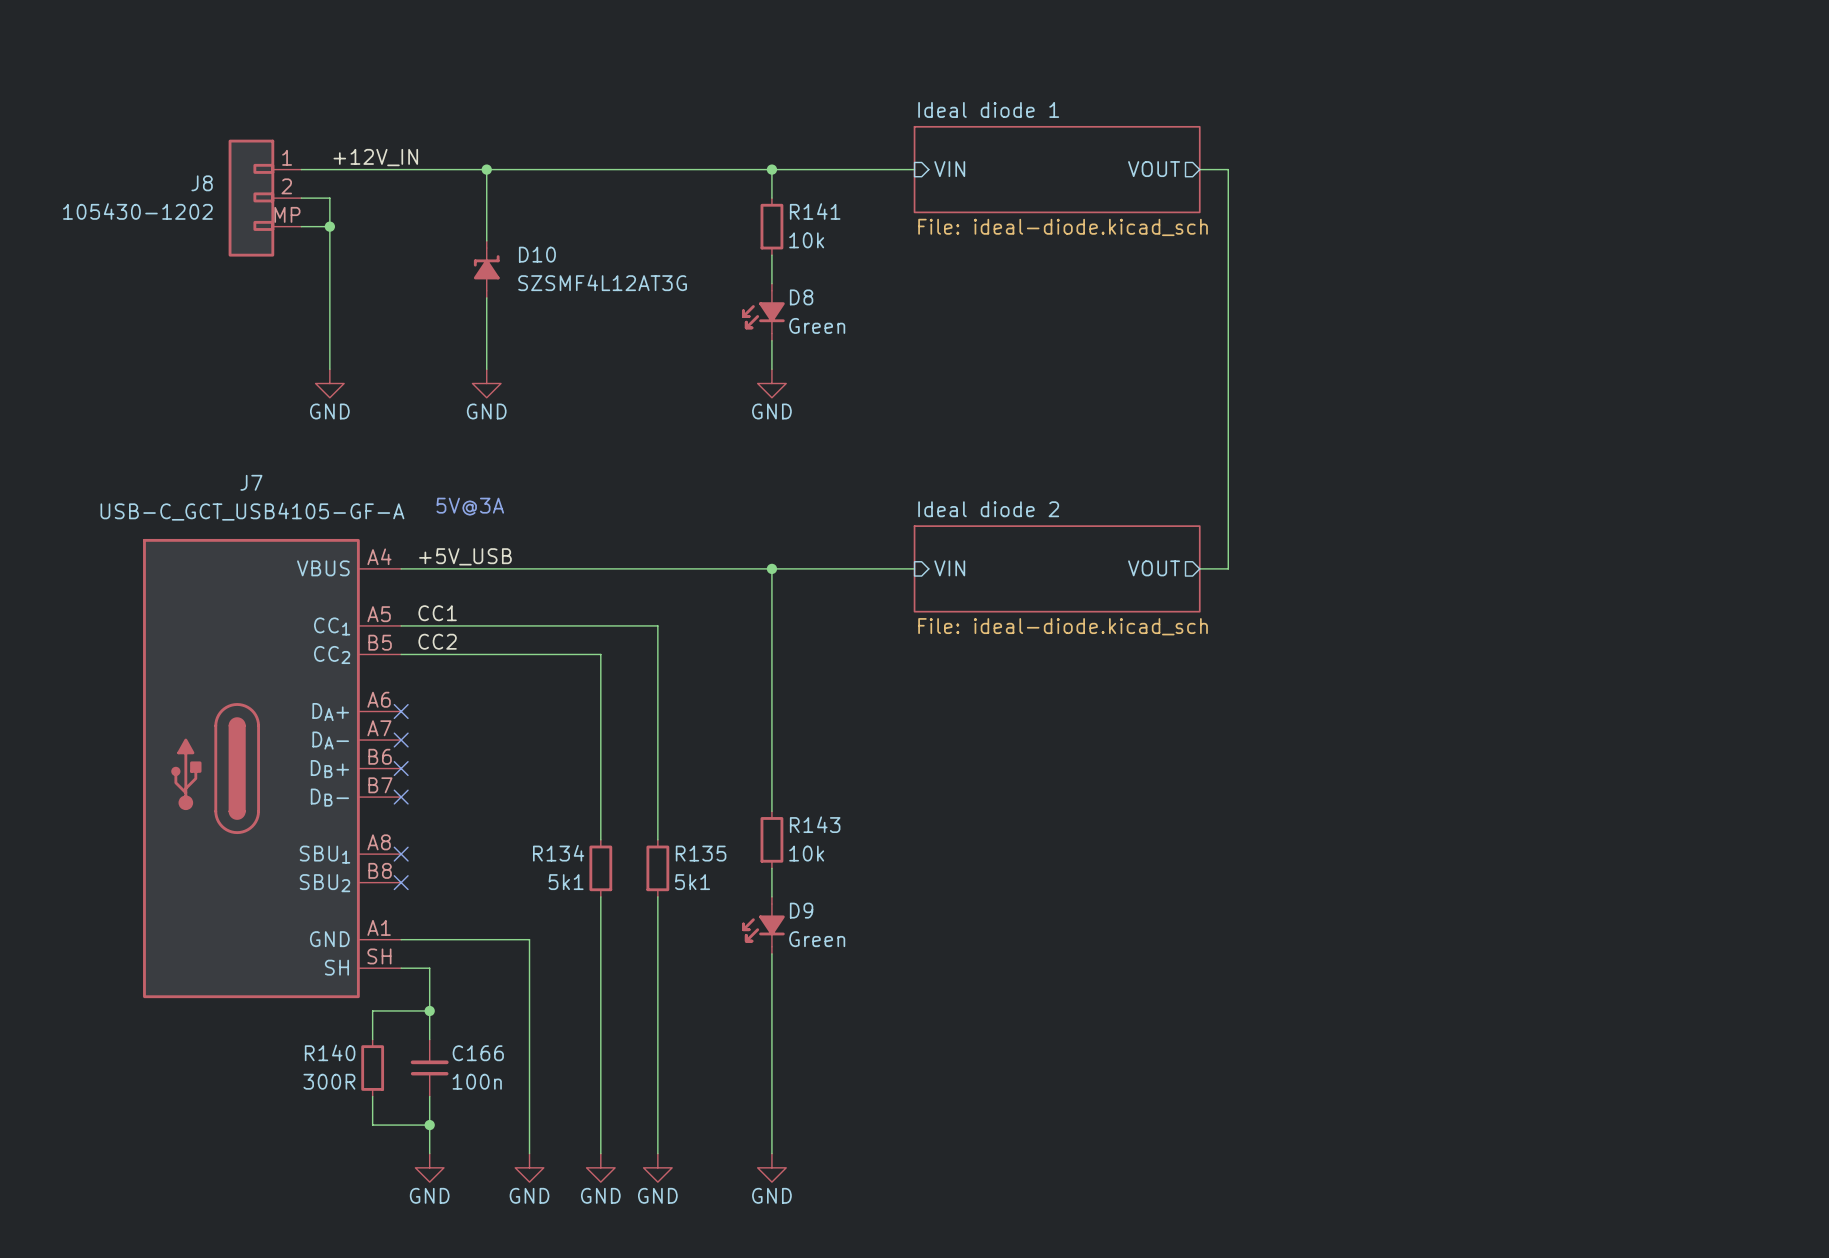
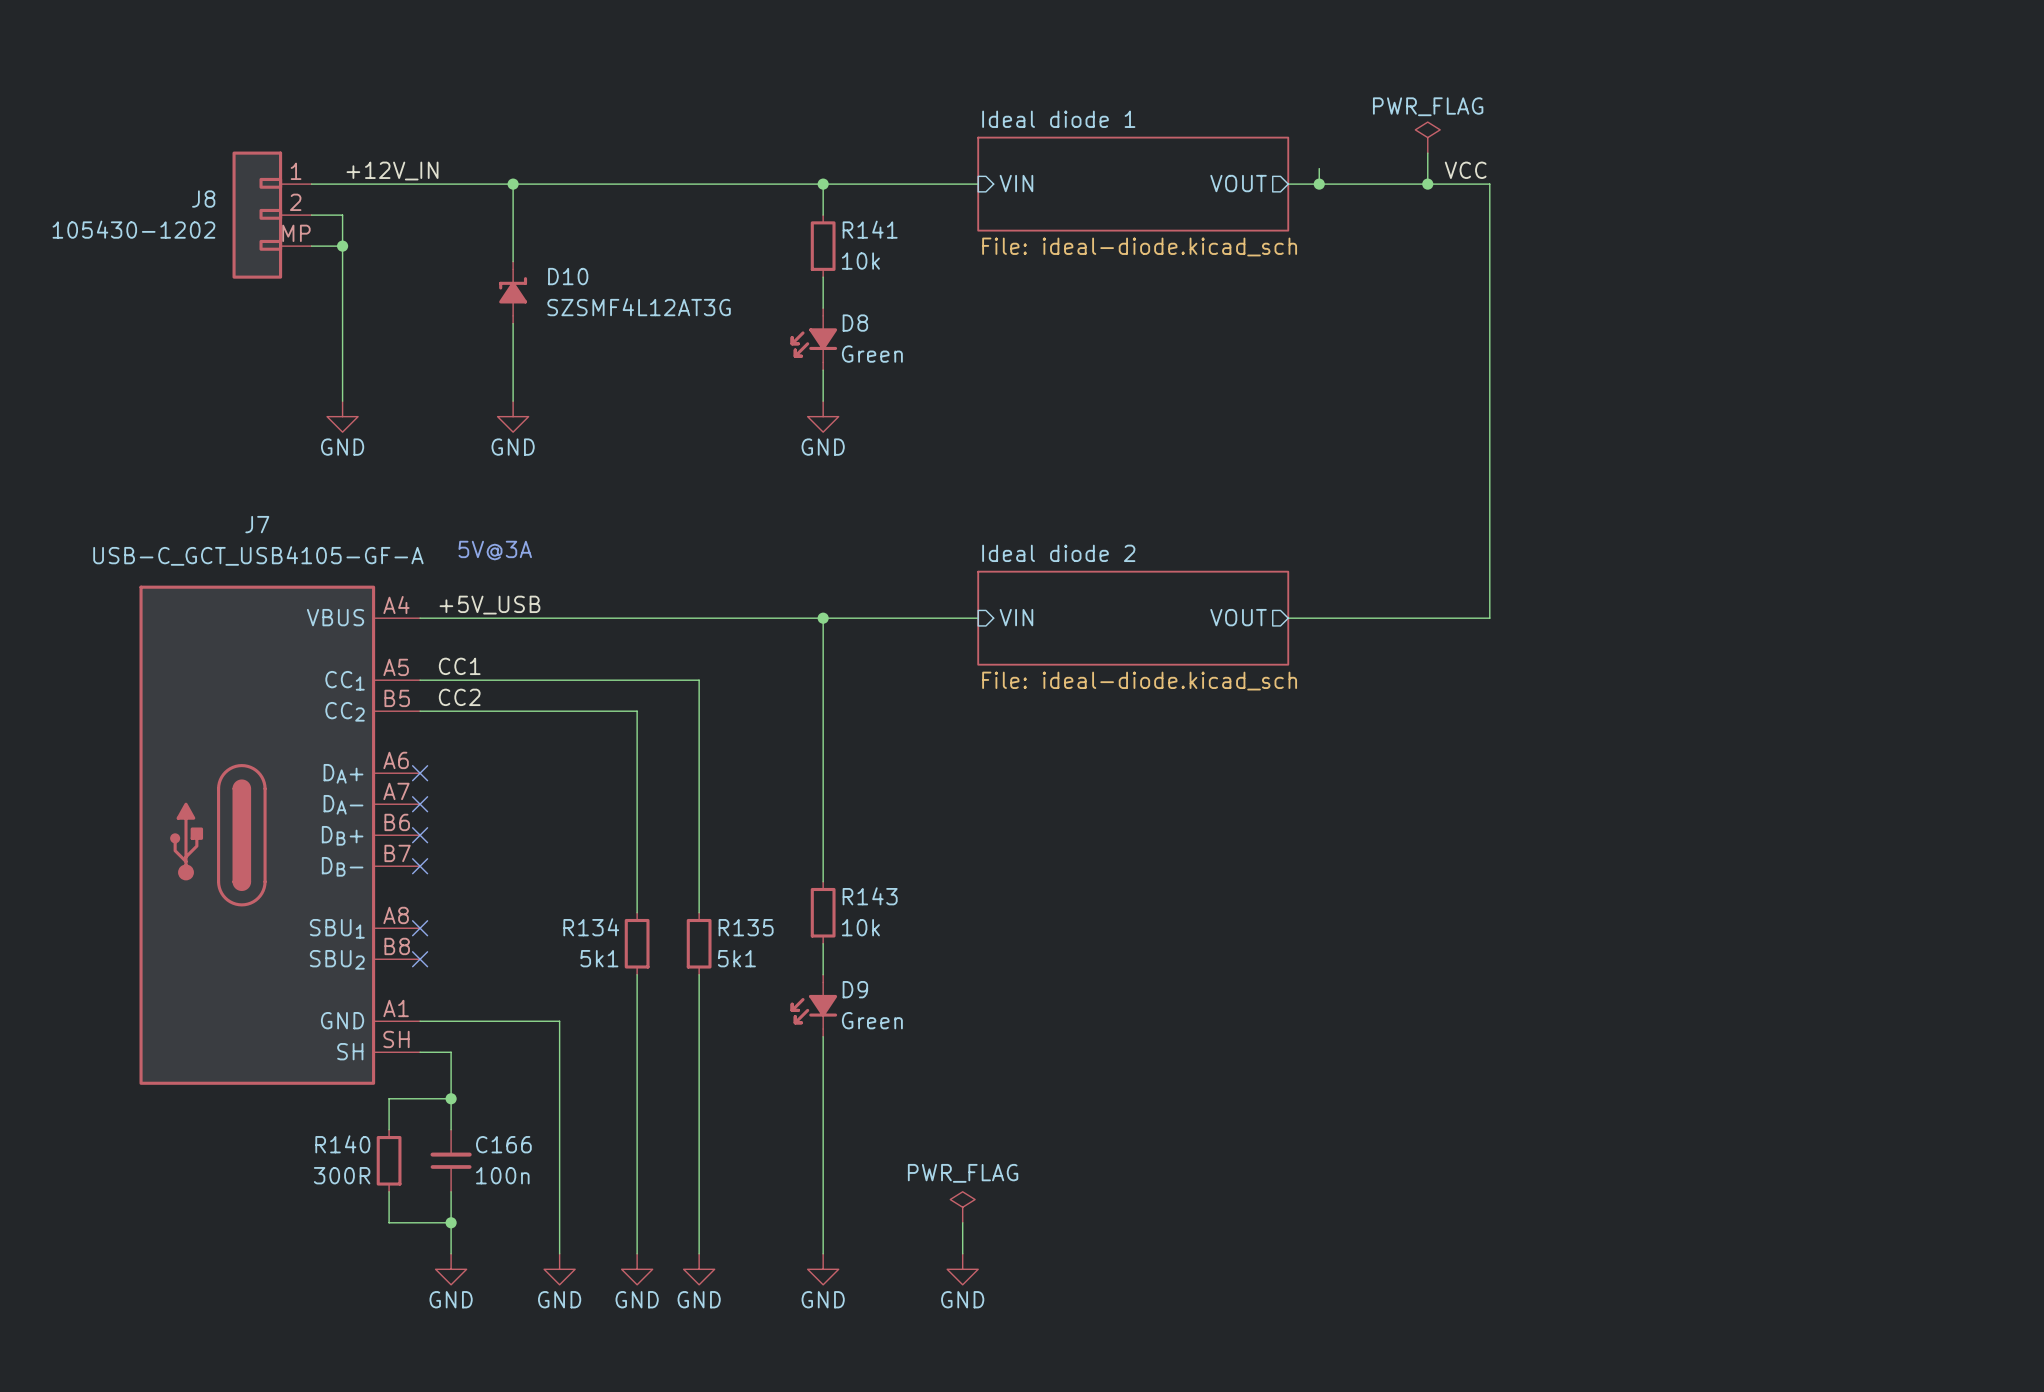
power symbol: none -> PWR_FLAG (1427, 137)
wire: none -> (1427, 153) (1427, 184)
label: none -> VCC (1465, 170)
wire: (1228, 169) (1228, 568) -> (1319, 168) (1319, 184) (1489, 184) (1489, 618) (1319, 618)
junction: none -> (1319, 184)
junction: none -> (1427, 184)
power symbol: none -> PWR_FLAG (962, 1207)
wire: none -> (962, 1222) (962, 1253)
power symbol: none -> GND (962, 1269)

